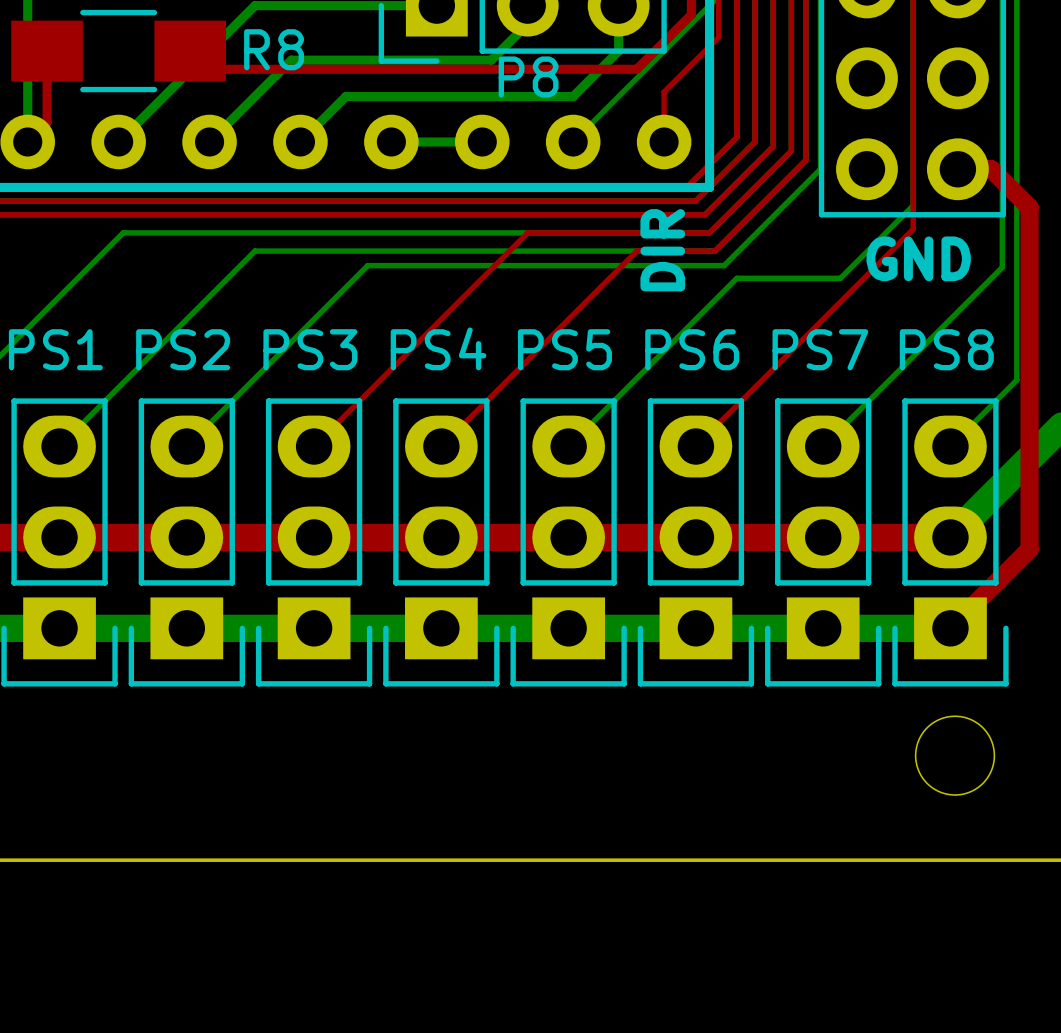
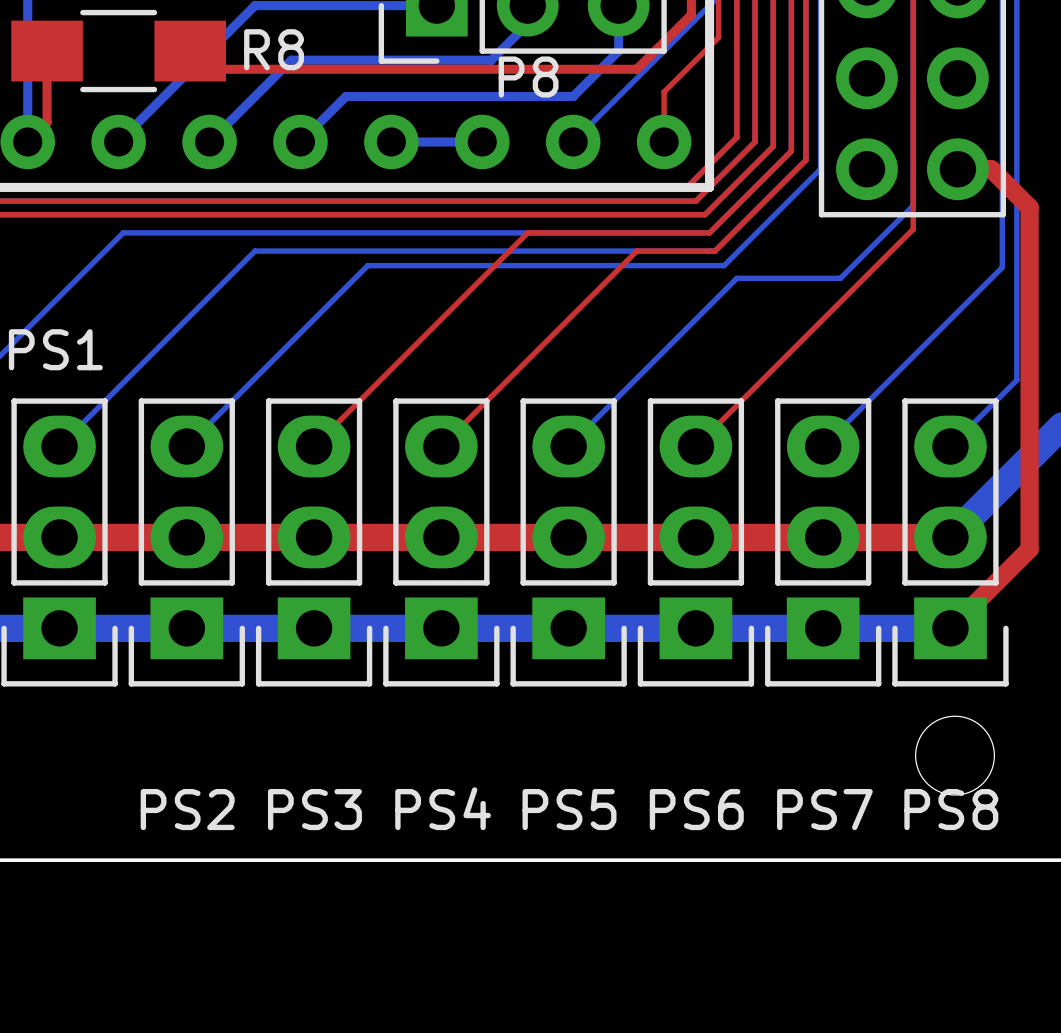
text: DIR (662, 250) -> none
text: GND (918, 258) -> none
PS4 name position: PS4 (438, 348) -> PS4 (443, 808)
PS2 name position: PS2 (183, 349) -> PS2 (187, 809)
PS3 name position: PS3 (310, 349) -> PS3 (314, 809)
PS5 name position: PS5 (564, 349) -> PS5 (569, 809)
PS6 name position: PS6 (692, 349) -> PS6 (696, 809)
PS7 name position: PS7 (820, 349) -> PS7 (824, 809)
PS8 name position: PS8 (946, 349) -> PS8 (951, 809)

